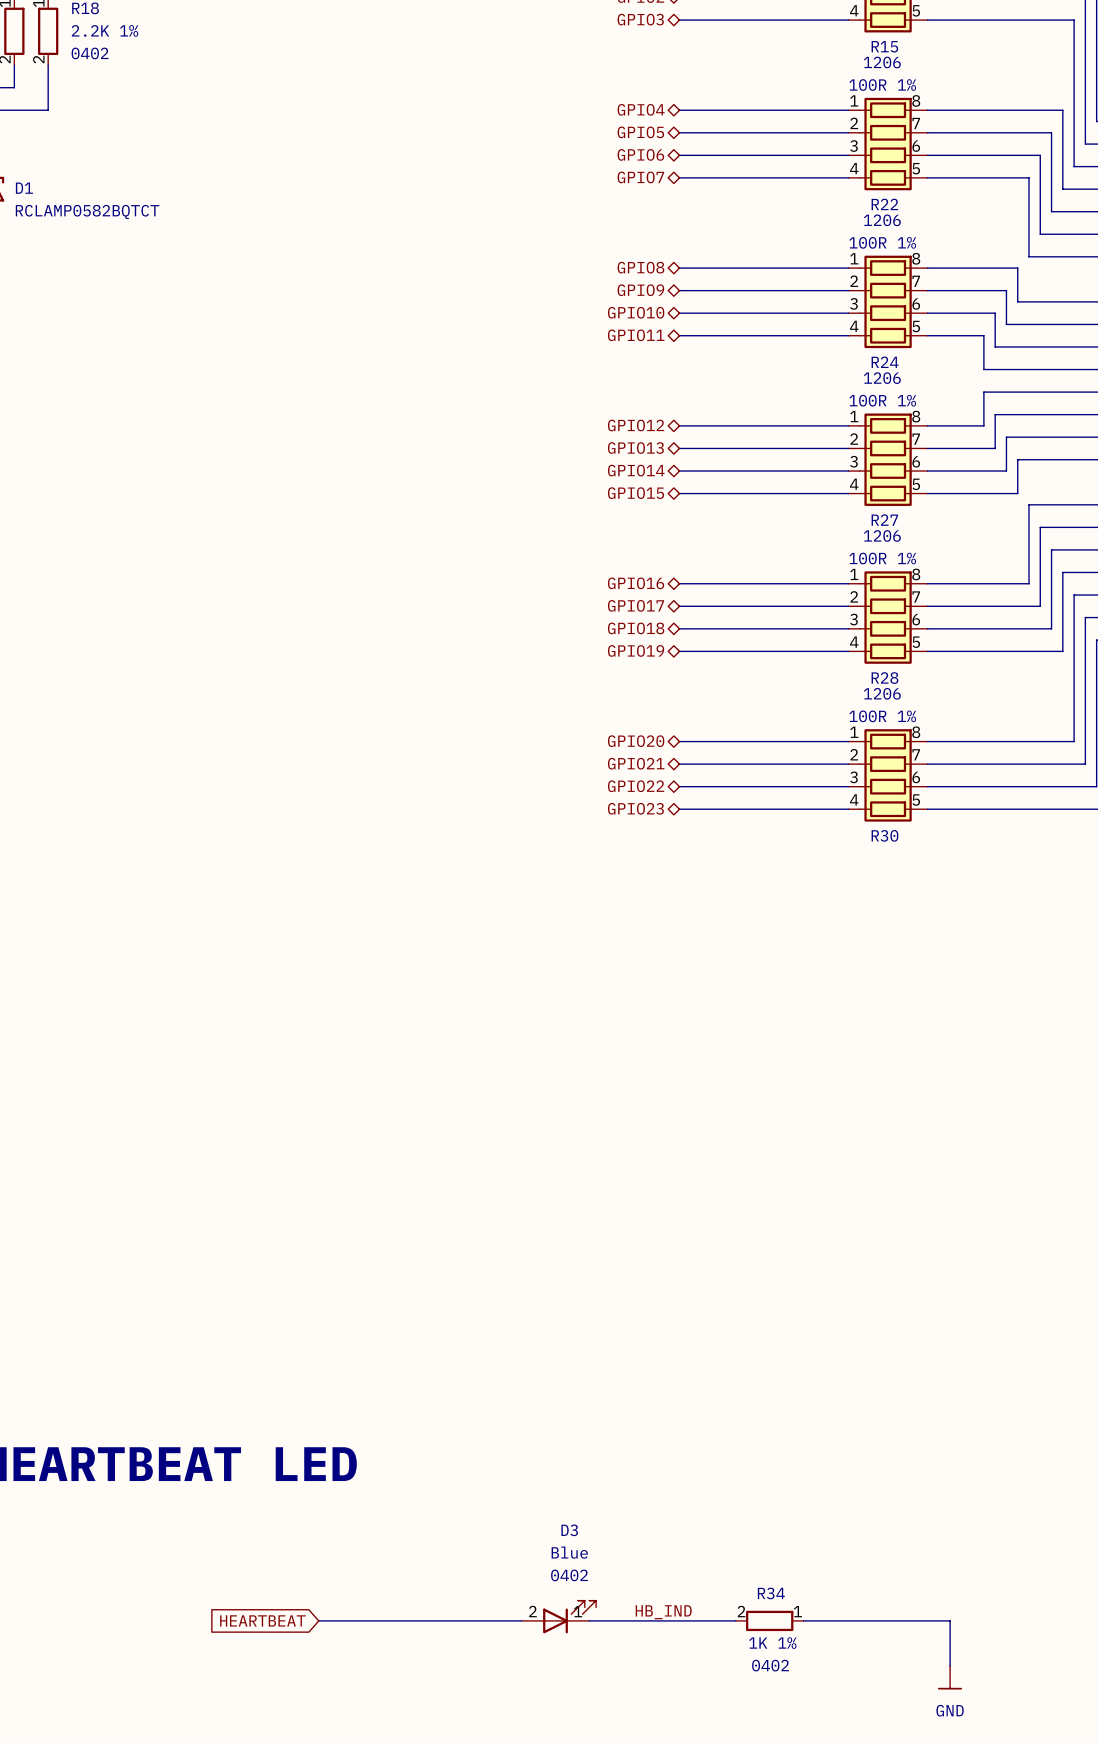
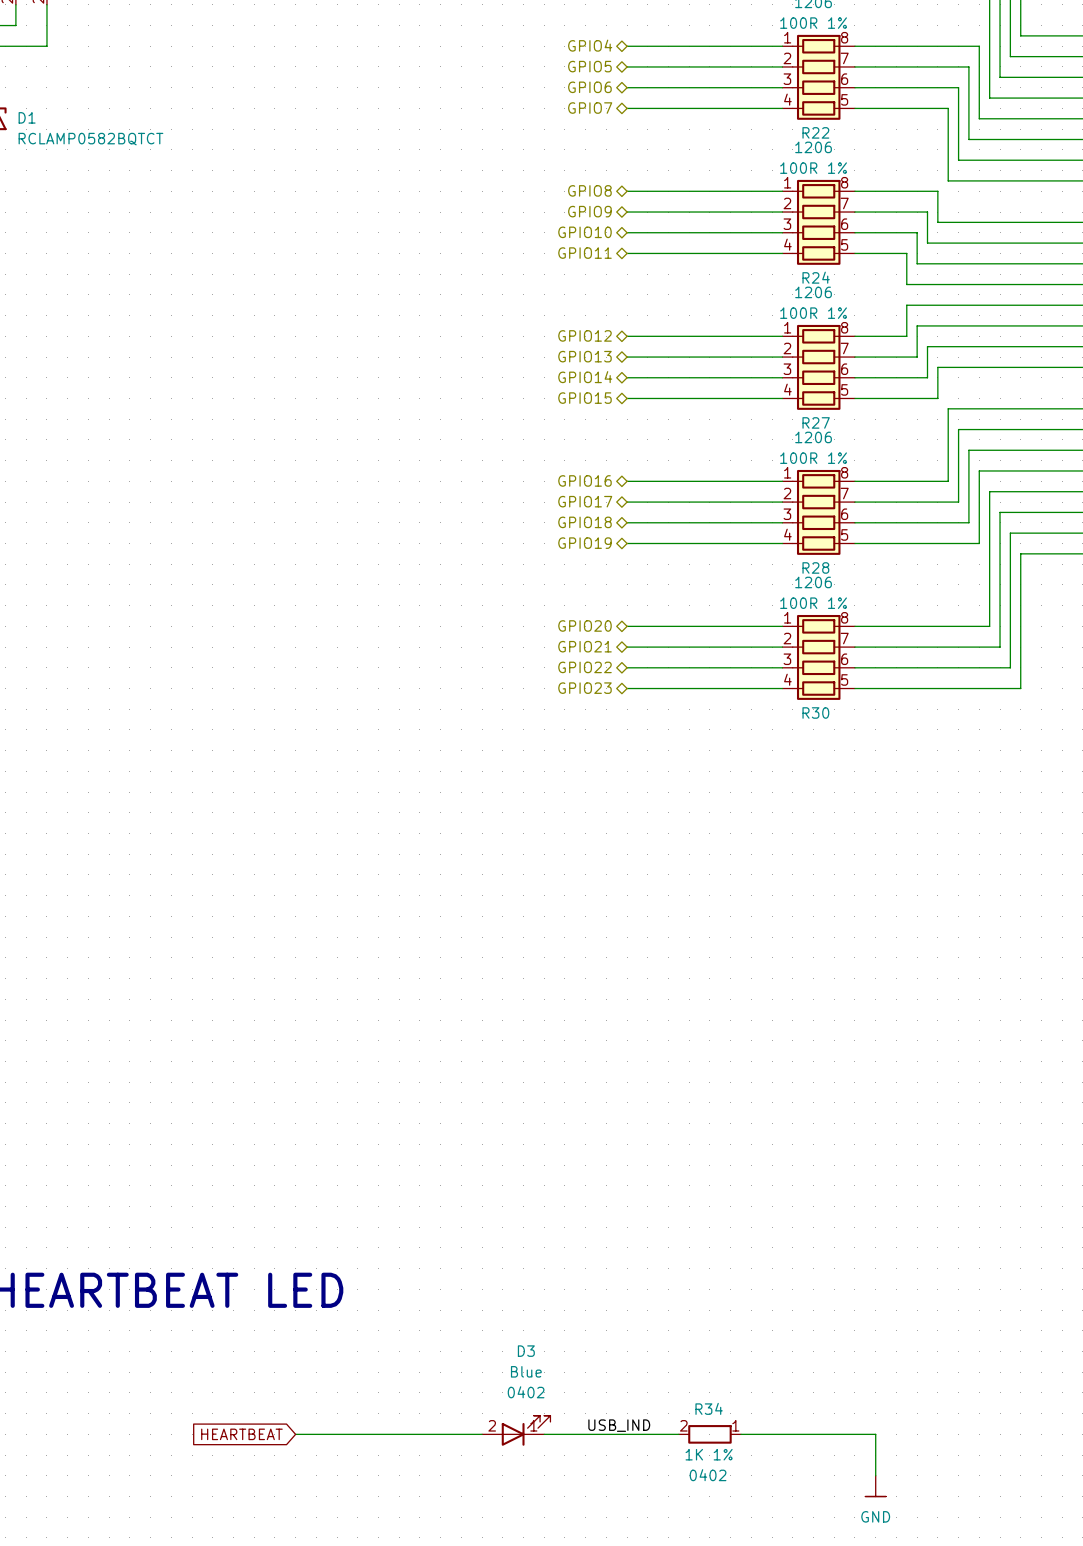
label: HB_IND (663, 1612) -> USB_IND (619, 1425)

